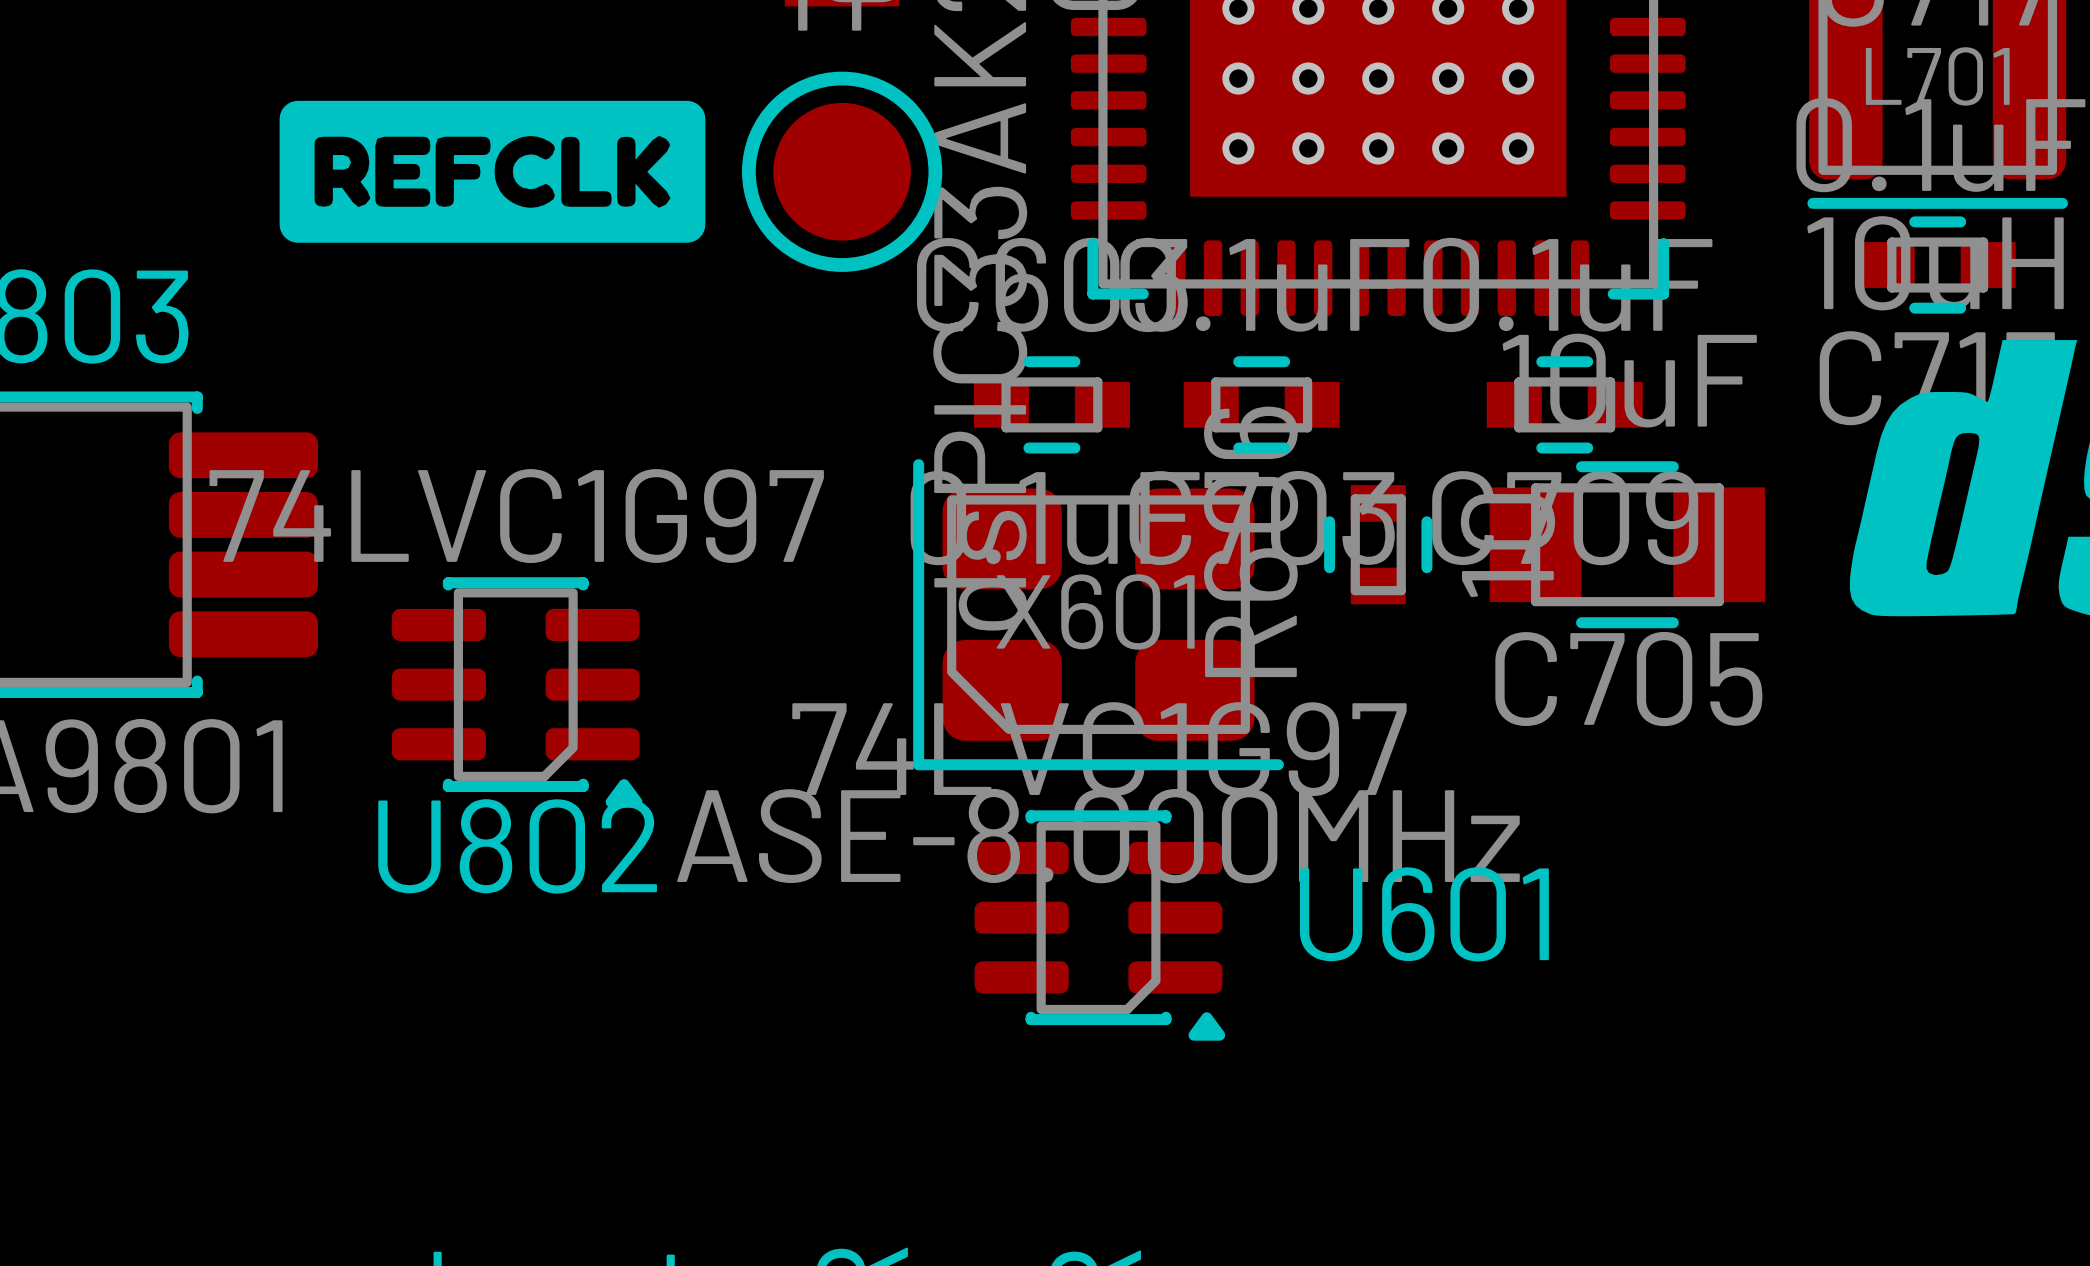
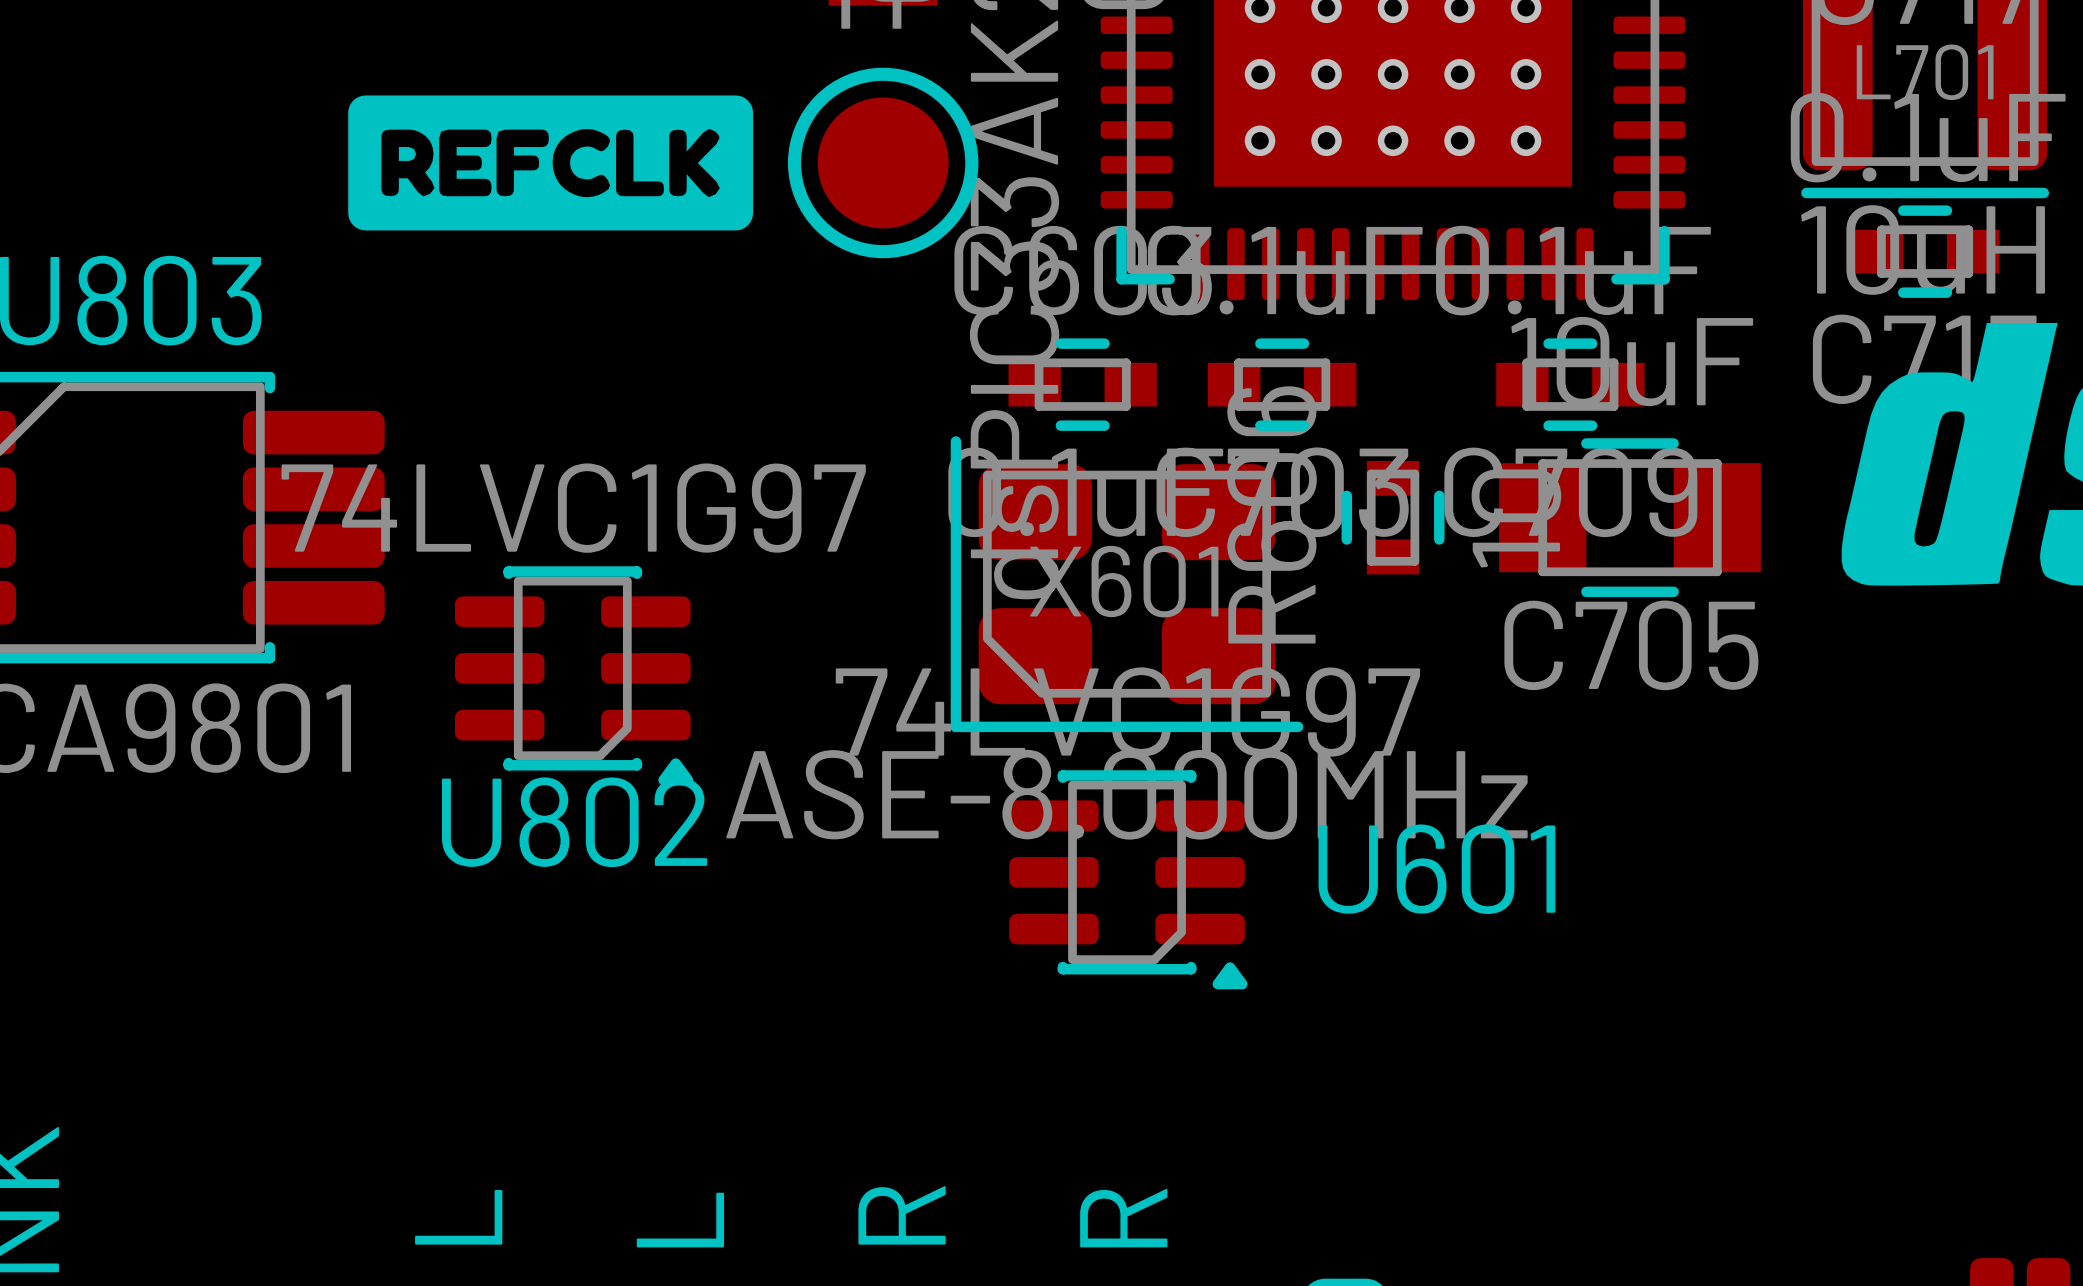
U802 position: (517, 692) -> (574, 675)

